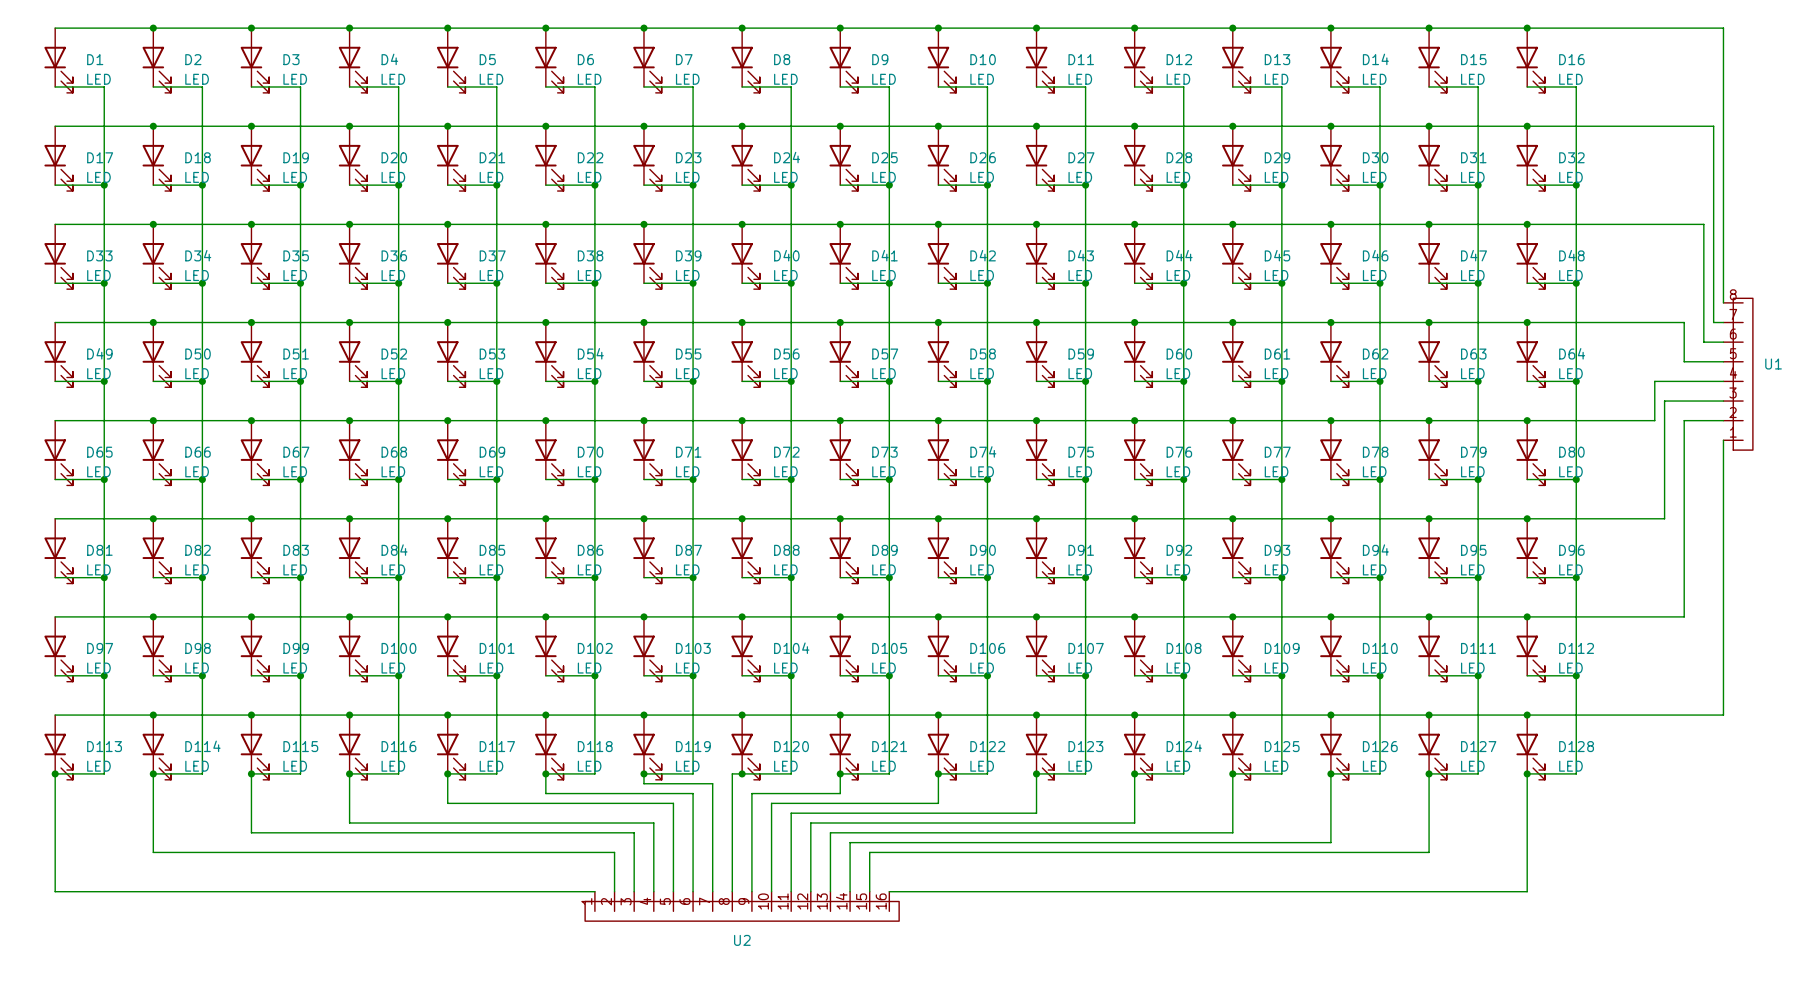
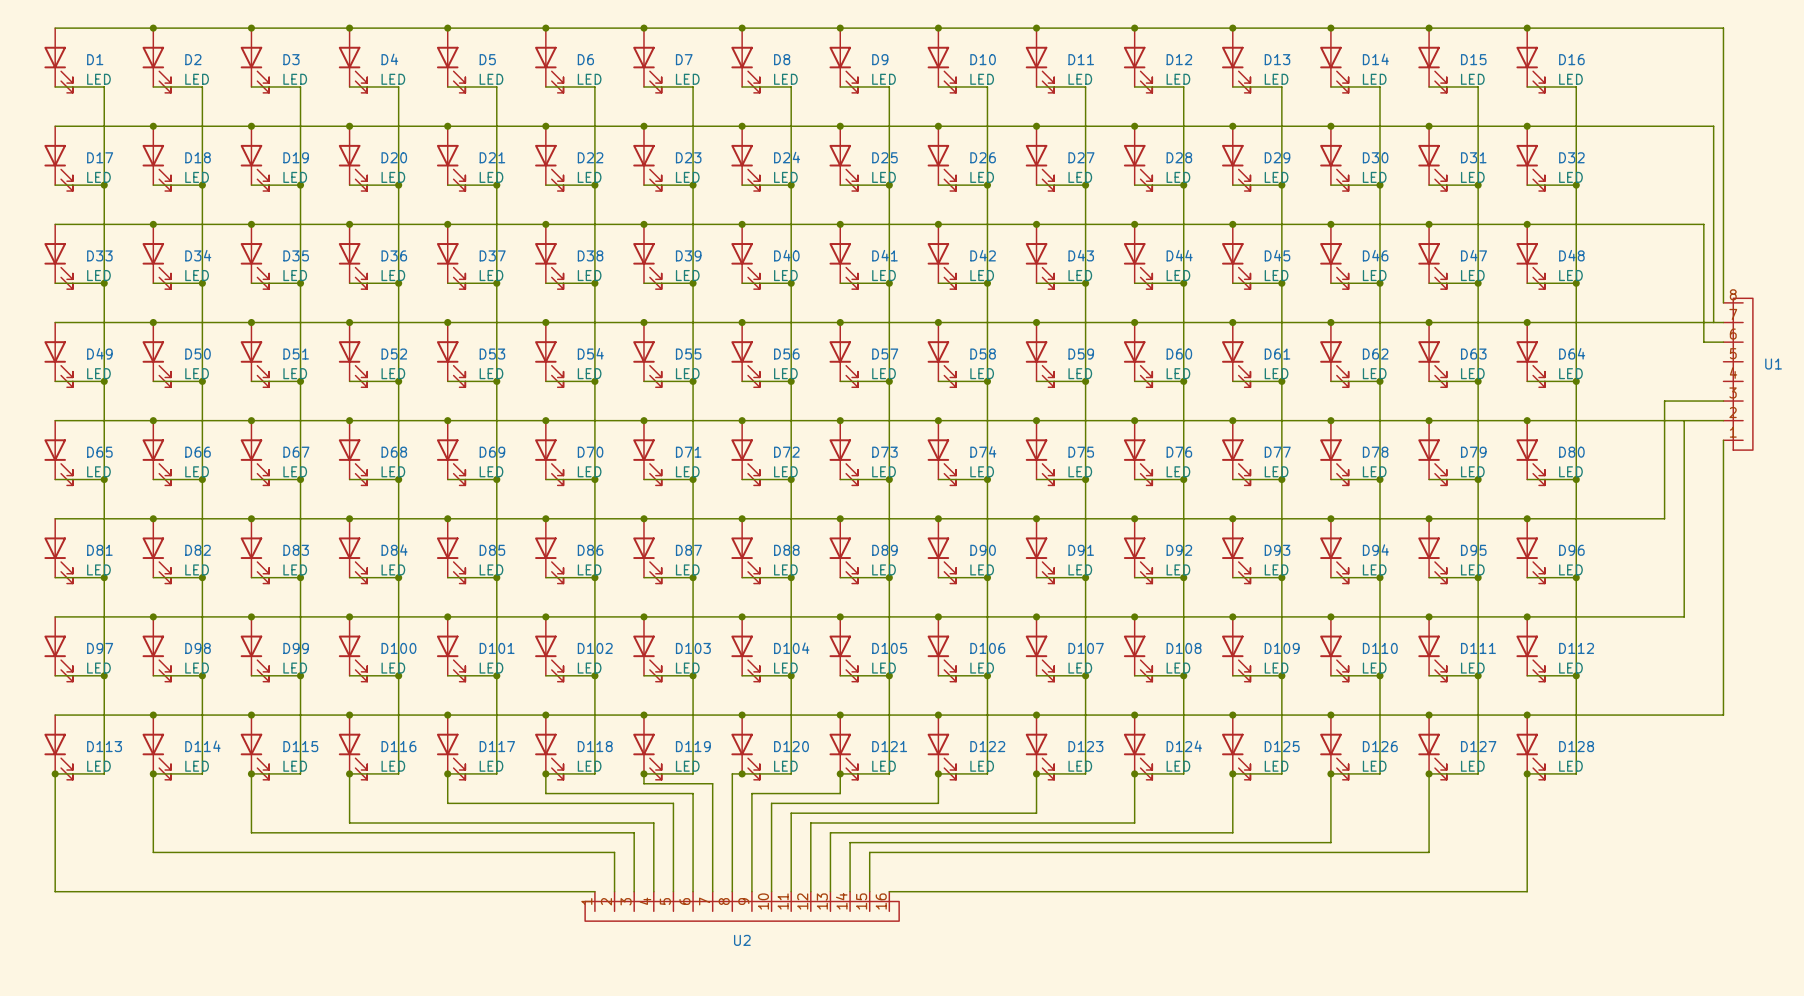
wire: (1684, 322) (1684, 361) (1723, 361) -> (1684, 322) (1713, 322)
wire: (1723, 381) (1654, 381) (1654, 420) -> (1684, 420) (1654, 420)

